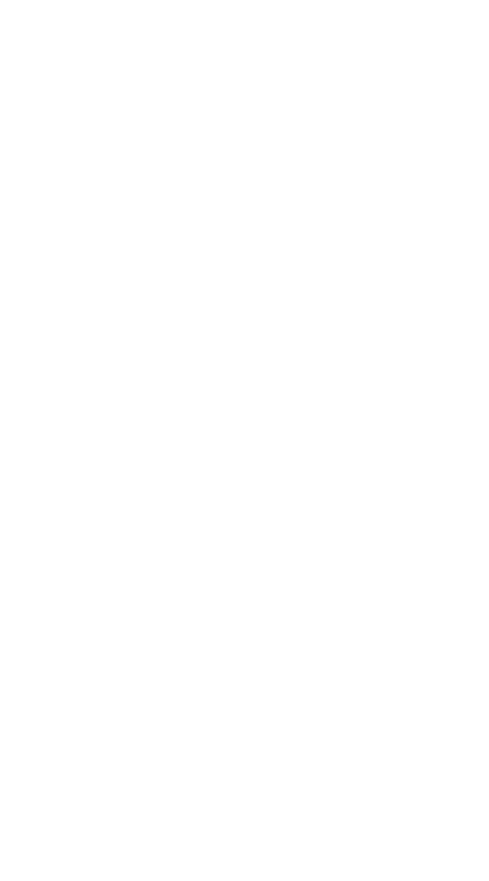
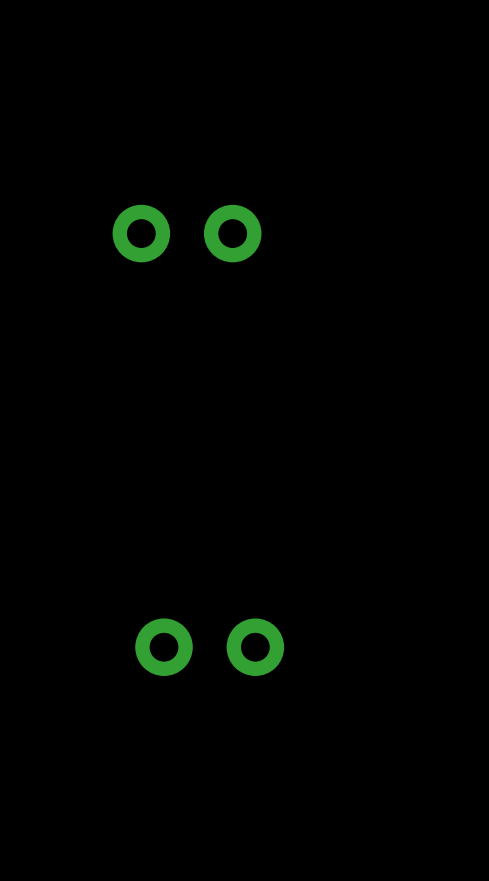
part: none -> (187, 233)
part: none -> (209, 647)

